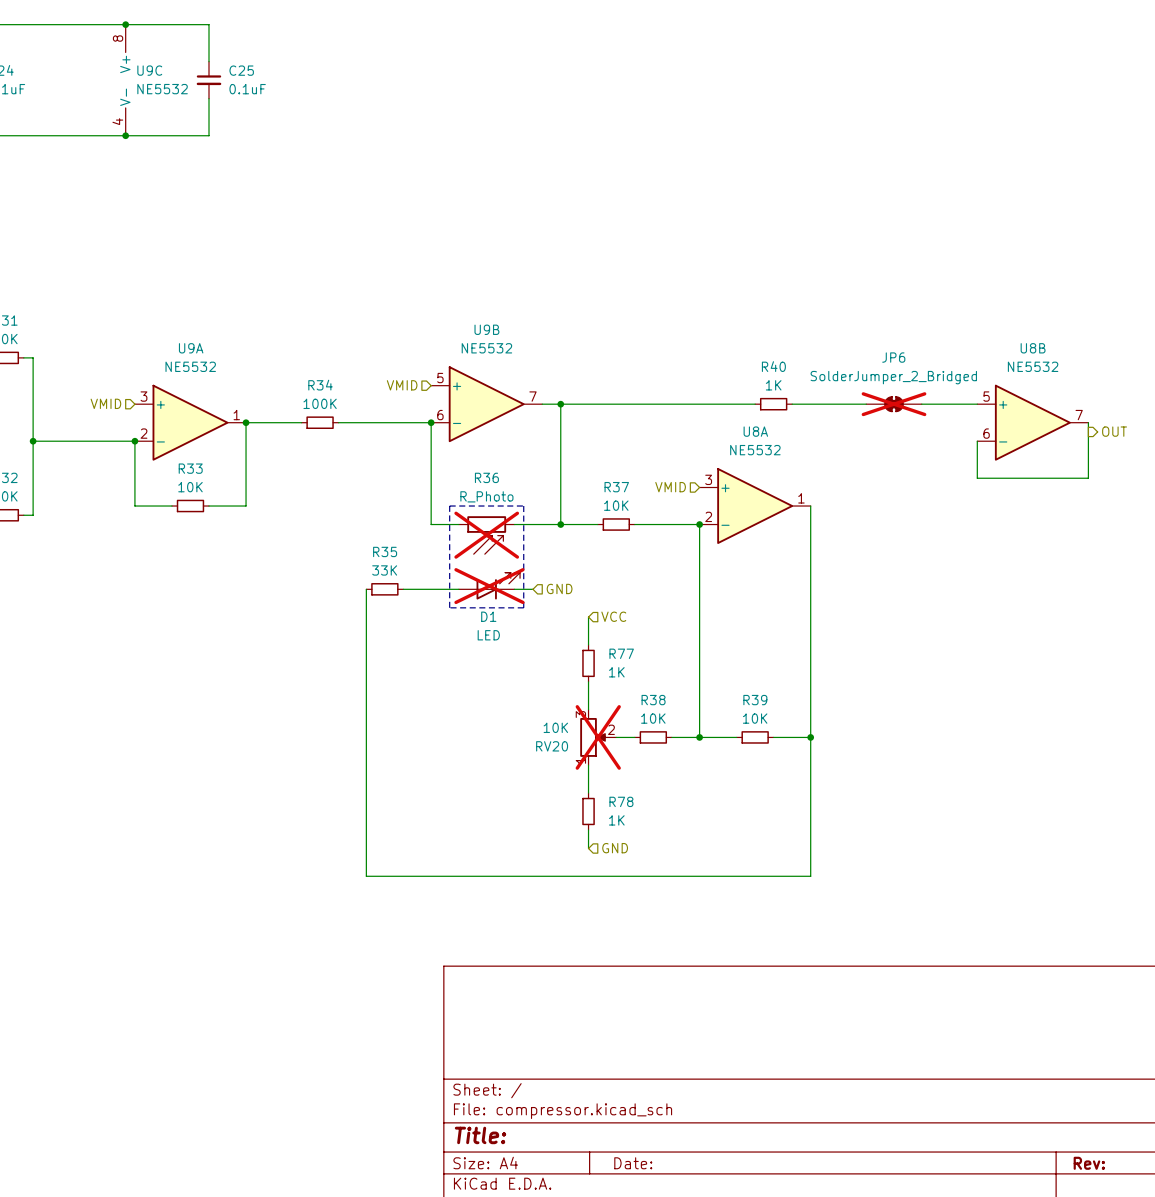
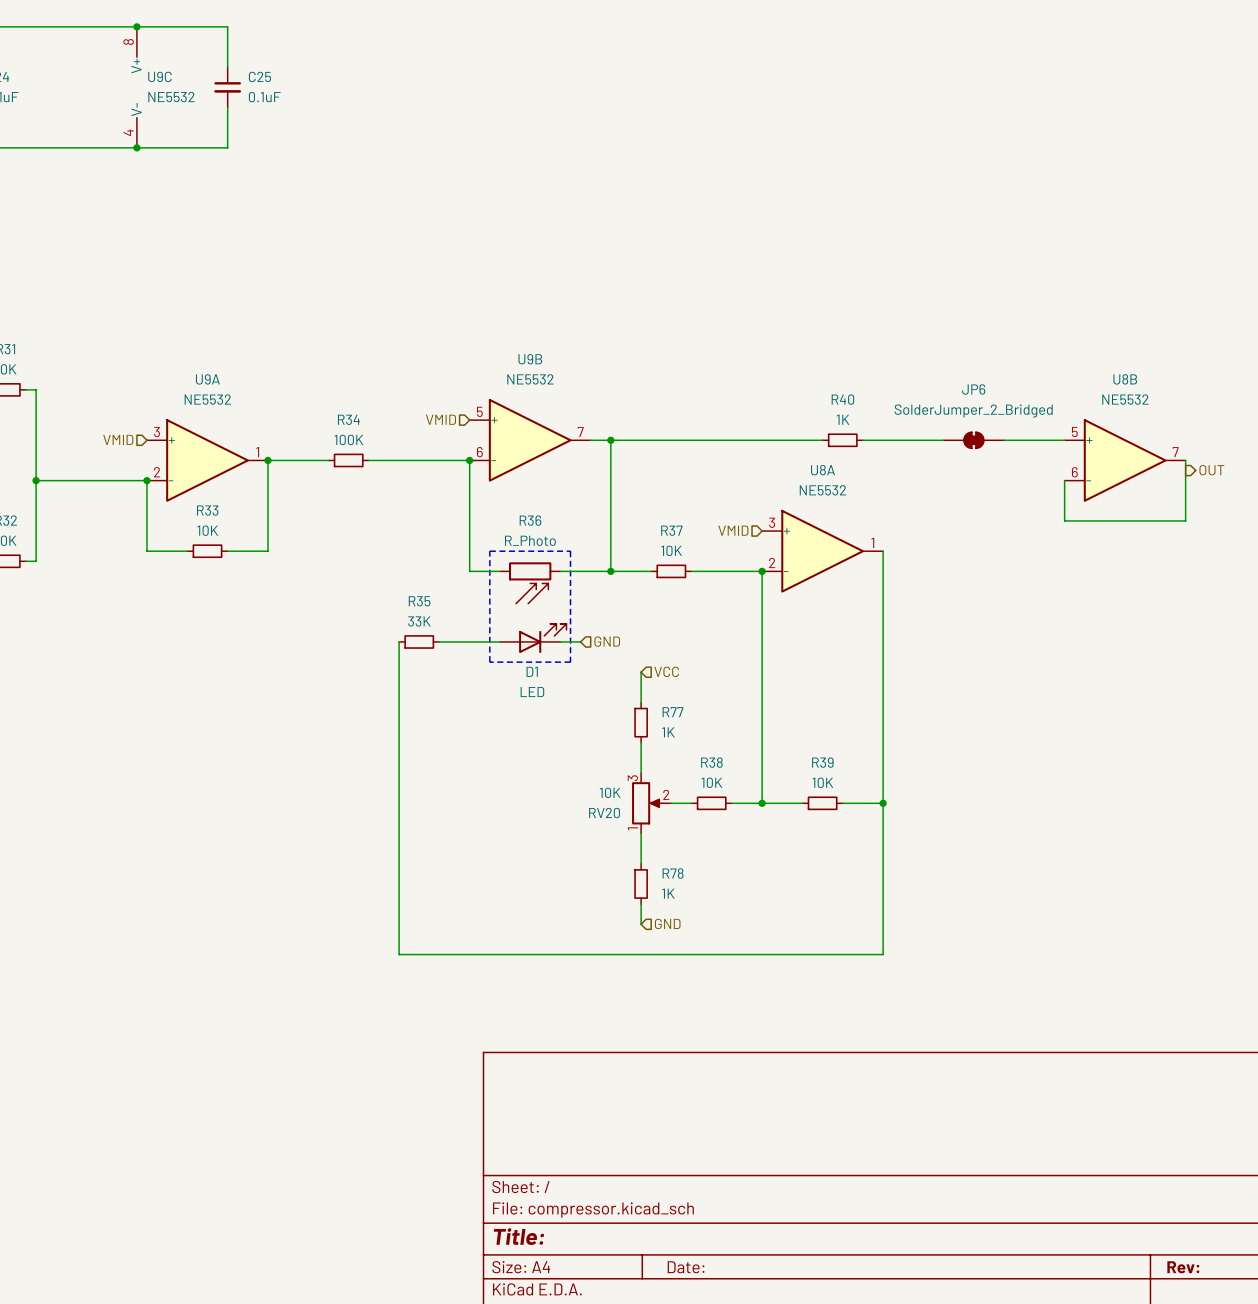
JP6 do-not-place cross: (894, 404) -> none
R36 do-not-place cross: (486, 535) -> none
D1 do-not-place cross: (489, 586) -> none
RV20 do-not-place cross: (598, 737) -> none

